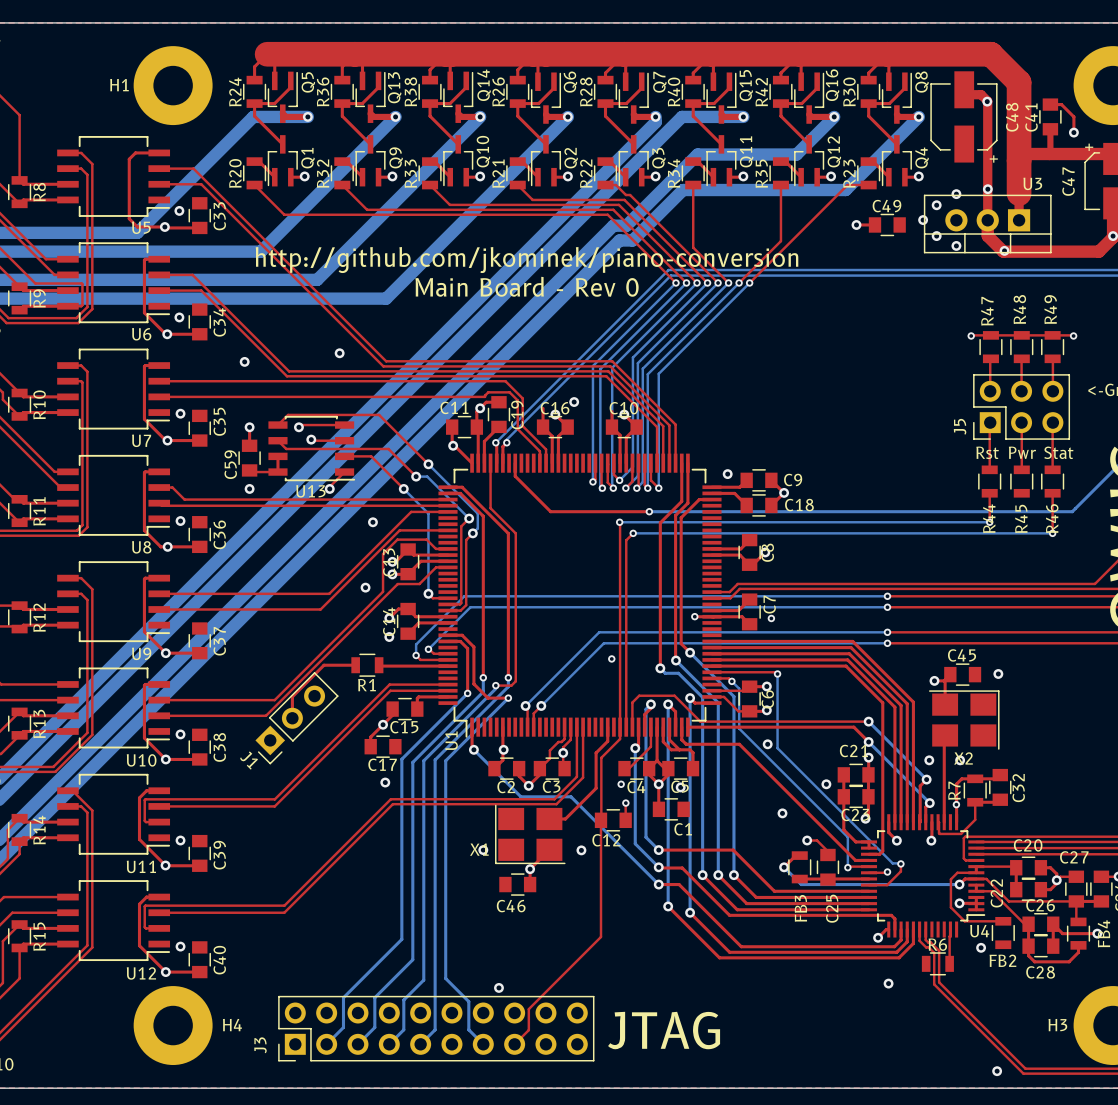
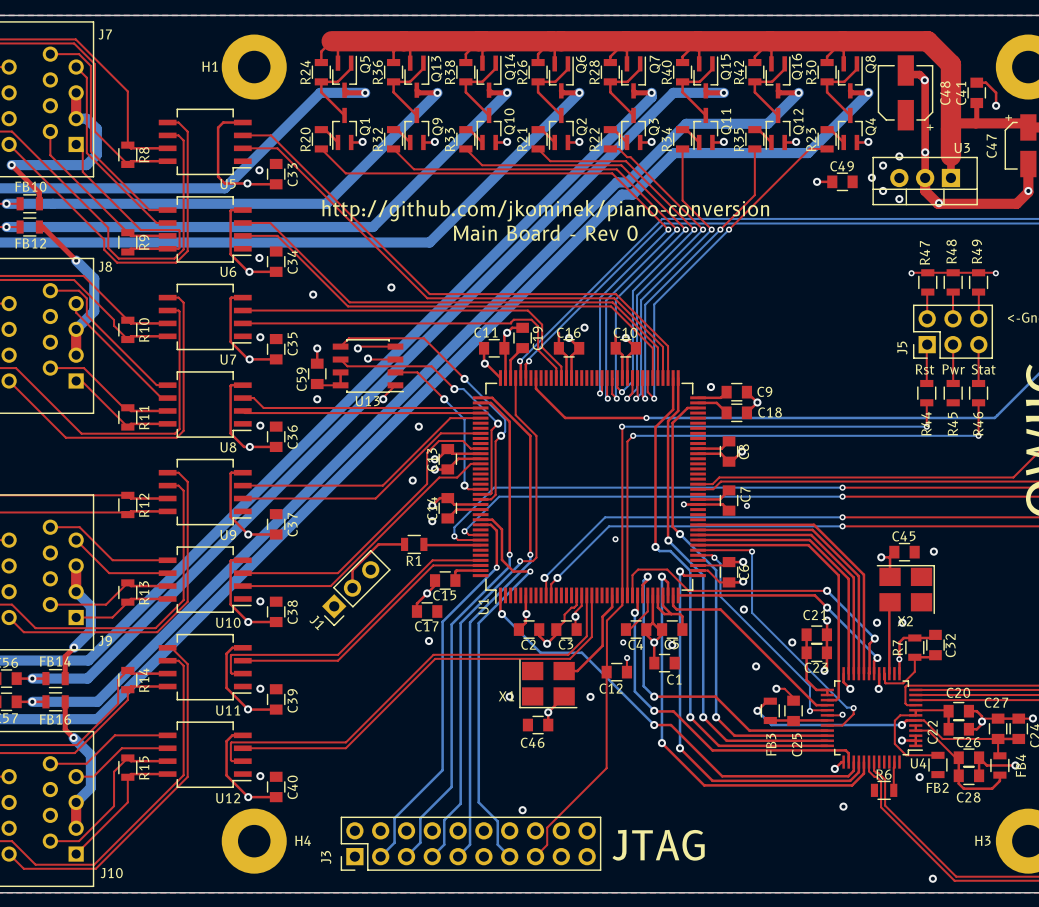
top track: none -> (998, 718) (1018, 718)

